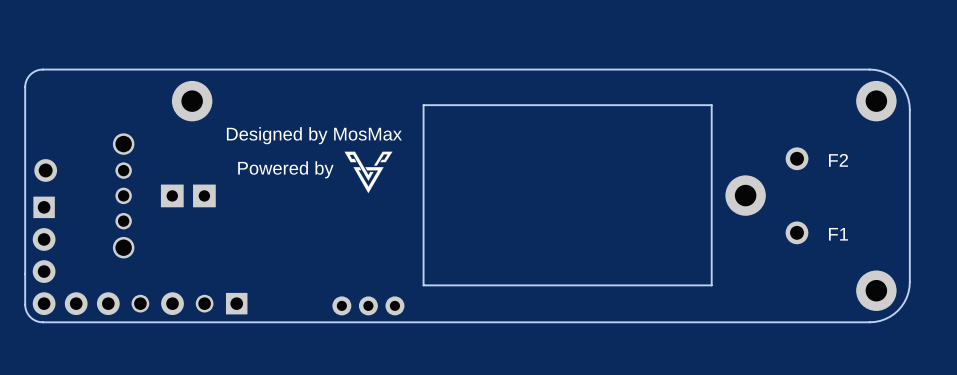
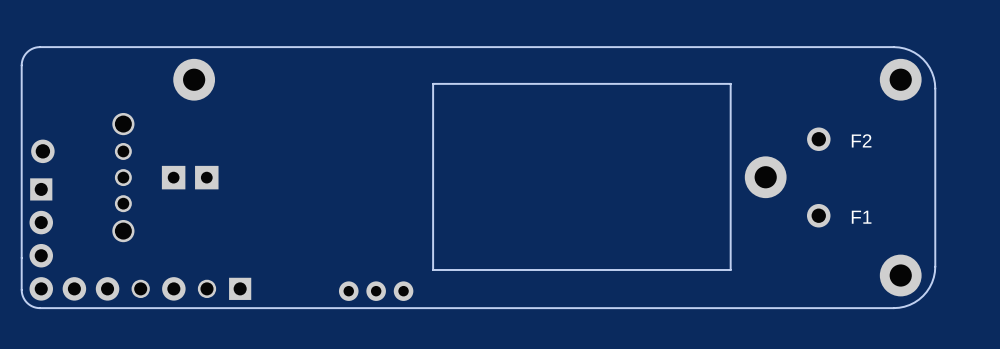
text: Designed by MosMax (314, 135) -> none
drawing: [344, 151, 393, 194] -> none
text: Powered by (285, 169) -> none

